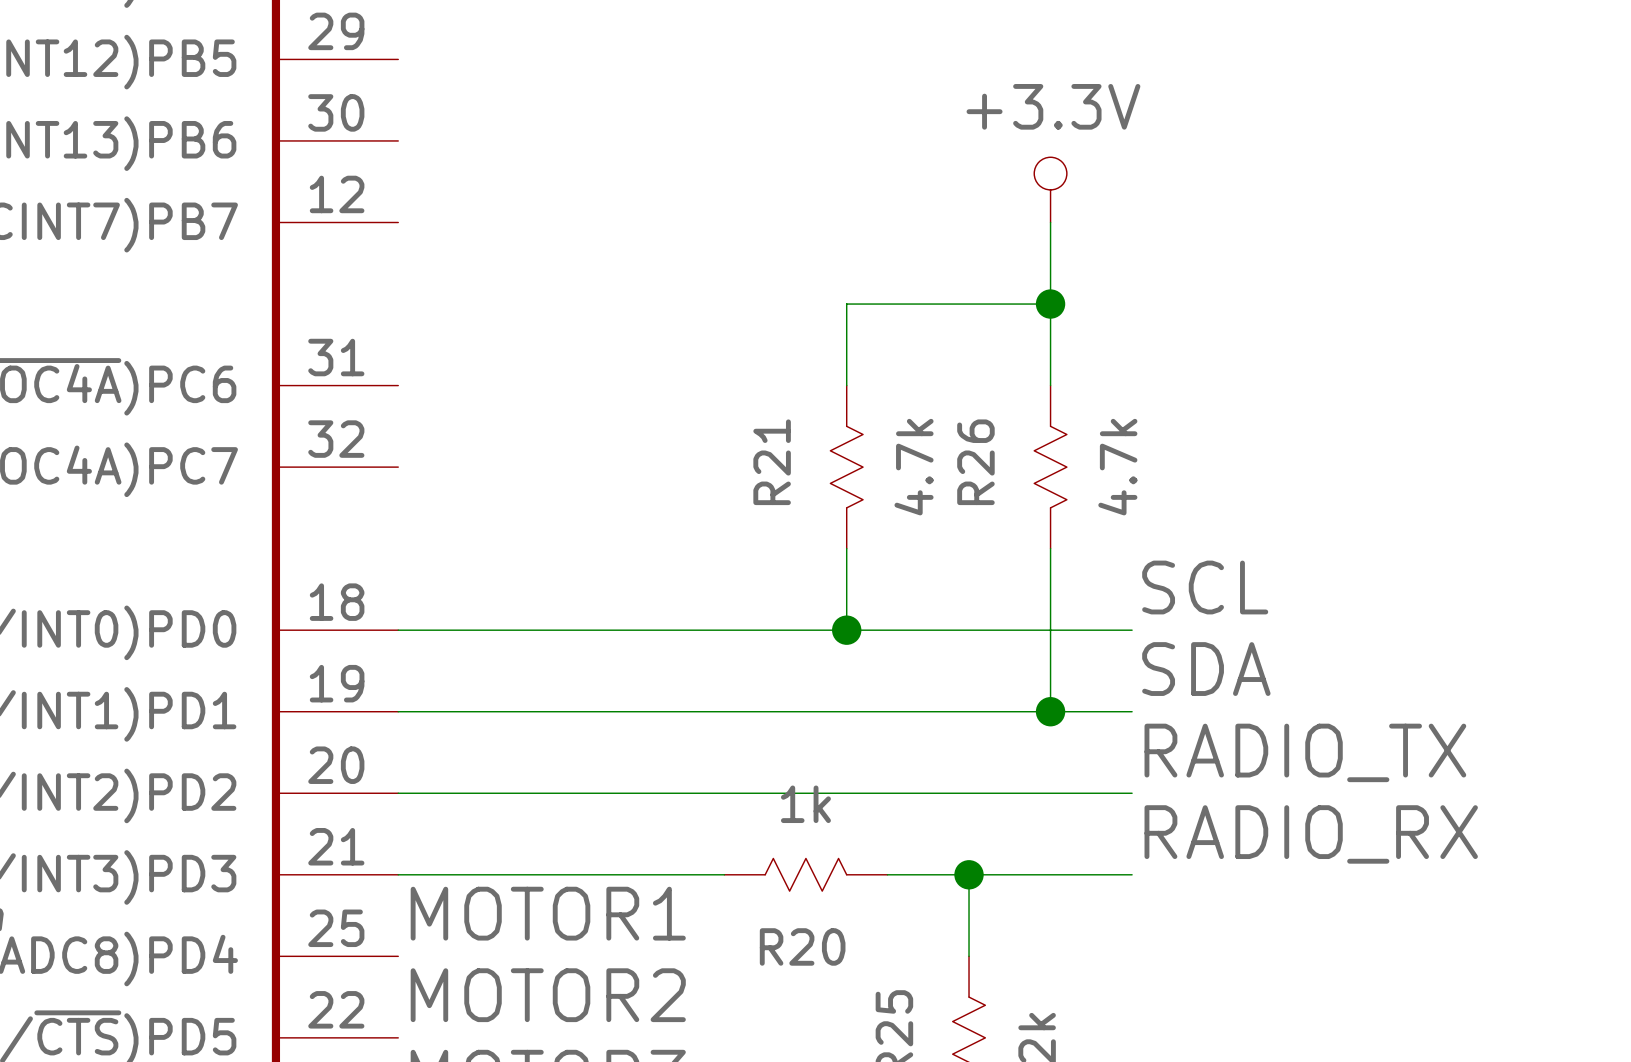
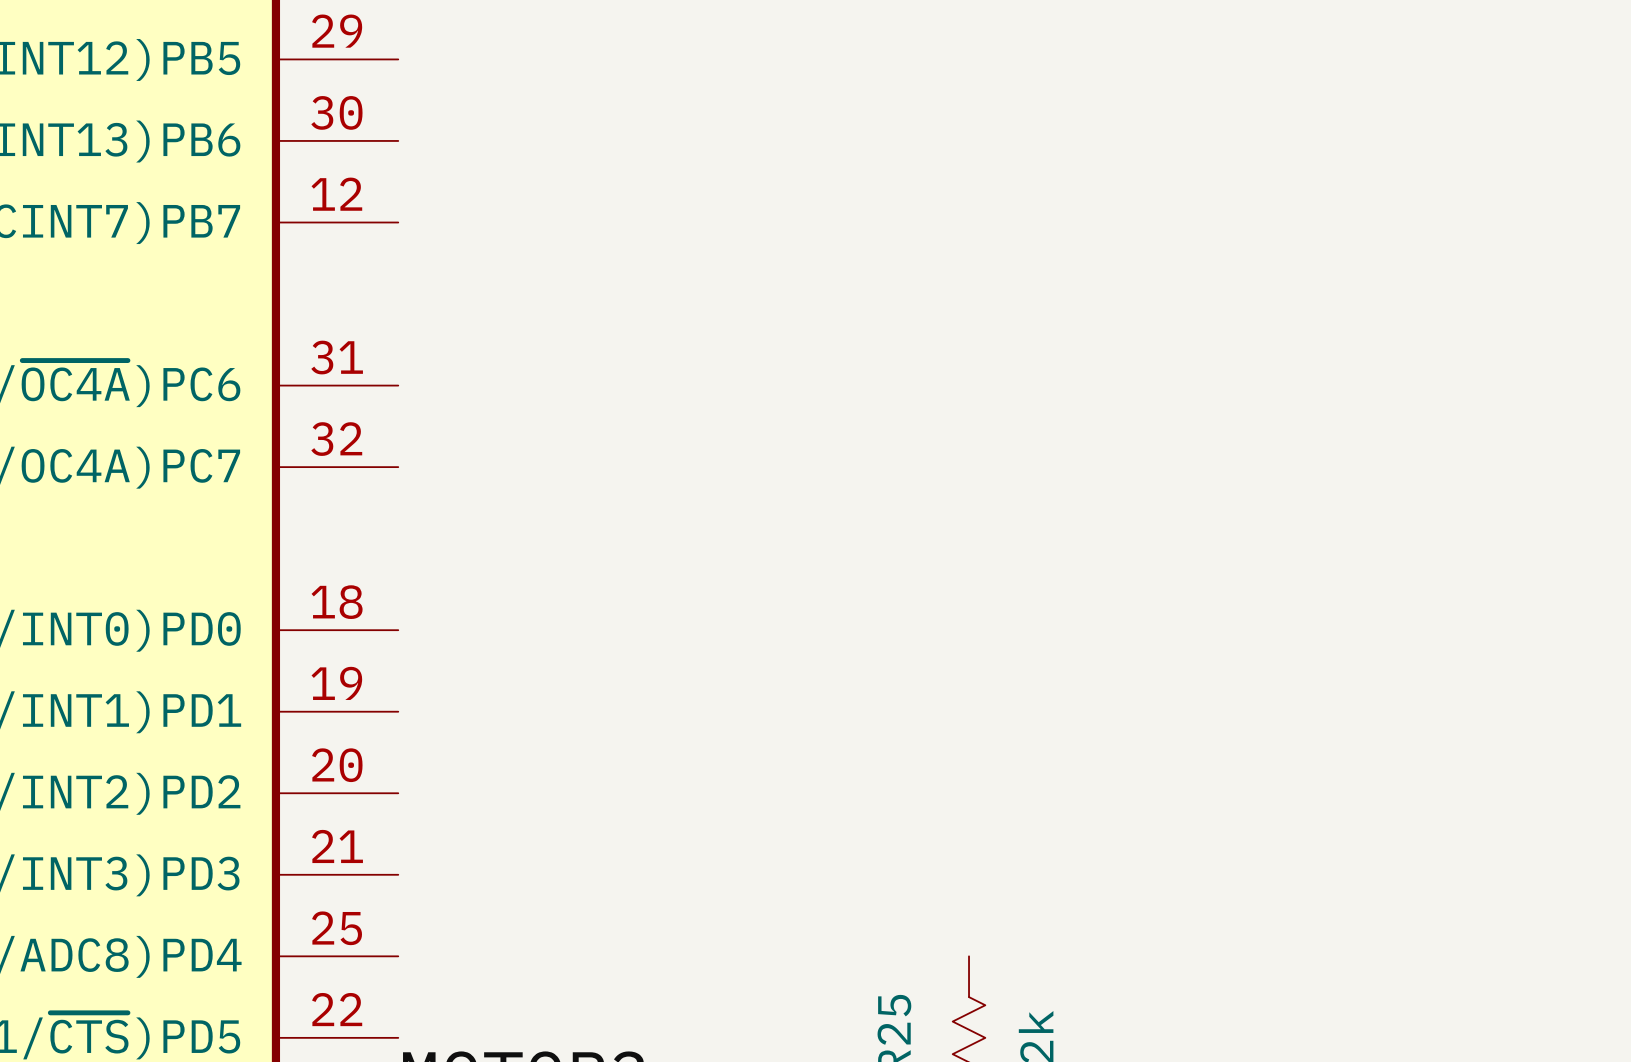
power symbol: +3.3V (1050, 189) -> none
wire: (1050, 222) (1050, 385) -> none
wire: (1050, 304) (846, 304) (846, 385) -> none
junction: (1050, 304) -> none
R21: 4.7k (846, 467) -> none
R26: 4.7k (1050, 467) -> none
wire: (846, 548) (846, 630) -> none
wire: (1050, 548) (1050, 711) -> none
label: SCL (1205, 587) -> none
wire: (398, 630) (1132, 630) -> none
junction: (846, 630) -> none
label: SDA (1206, 669) -> none
wire: (398, 711) (1132, 711) -> none
junction: (1050, 711) -> none
label: RADIO_TX (1305, 752) -> none
wire: (398, 793) (1132, 793) -> none
label: RADIO_RX (1311, 834) -> none
wire: (398, 874) (724, 874) -> none
R20: 1k (805, 874) -> none
wire: (887, 874) (1132, 874) -> none
wire: (969, 874) (969, 956) -> none
junction: (969, 874) -> none
label: MOTOR1 (548, 913) -> none
label: MOTOR2 (548, 995) -> none

